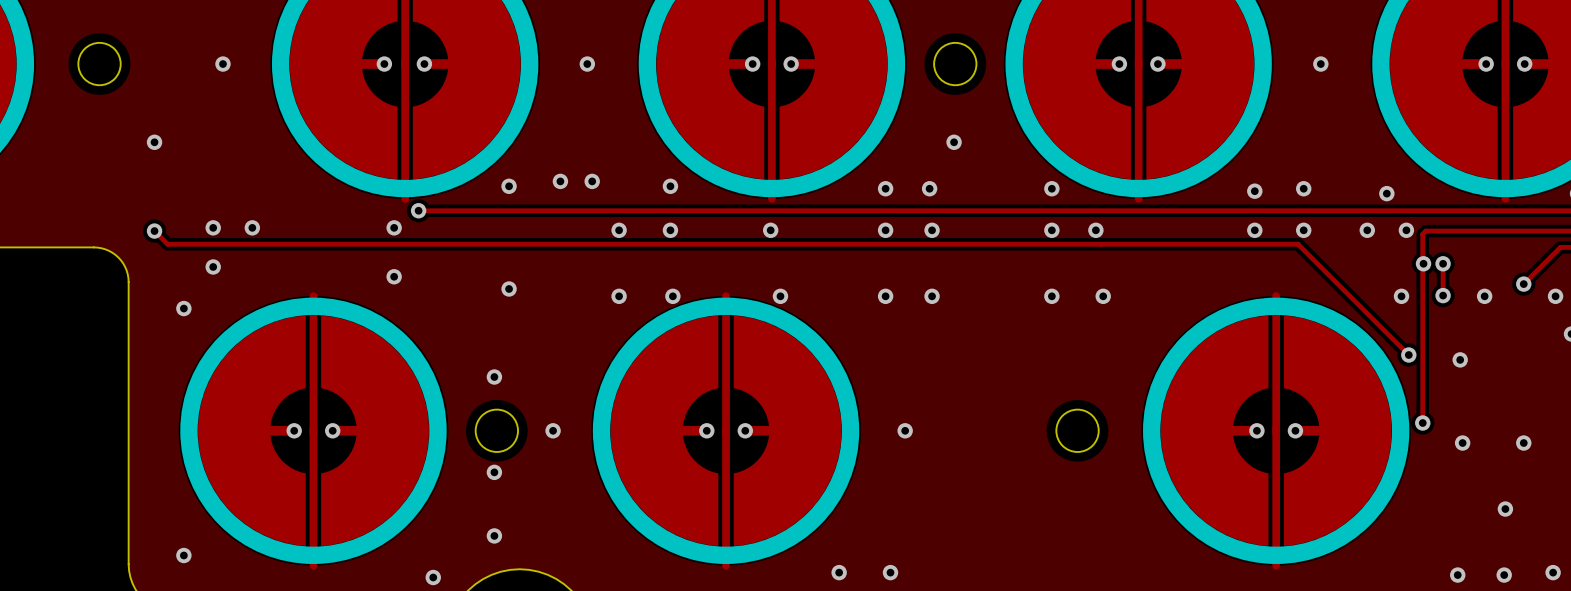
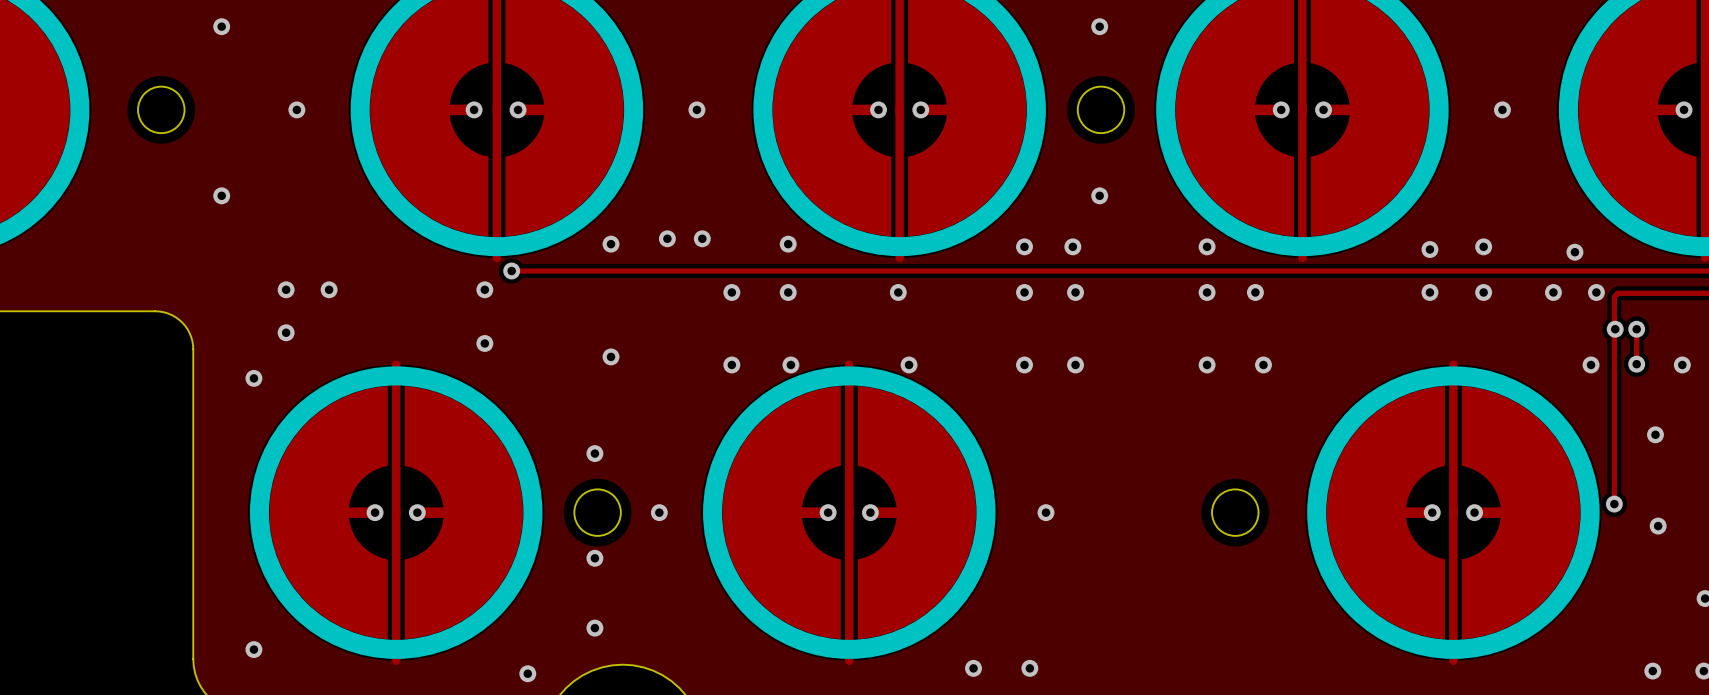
track: (154, 231) (167, 244) (1298, 244) (1408, 355) -> none
via: (154, 231) -> none
via: (1408, 355) -> none

